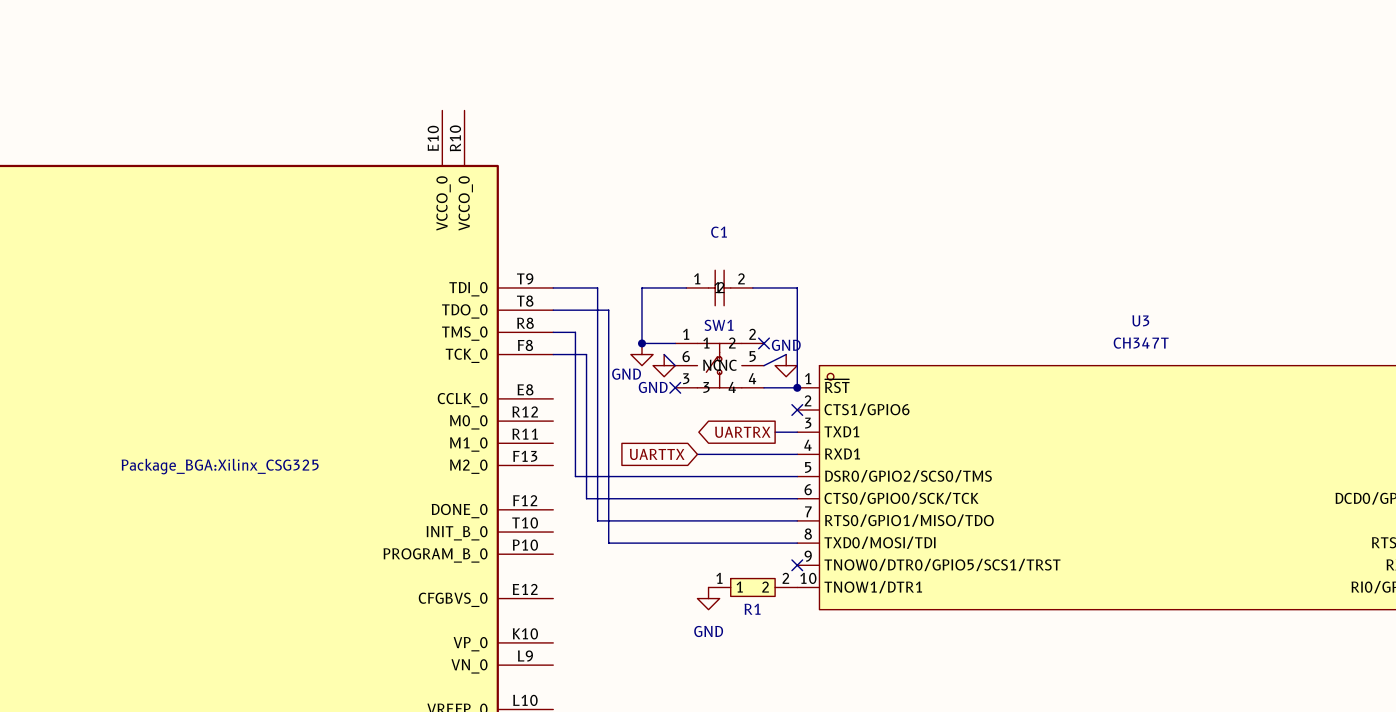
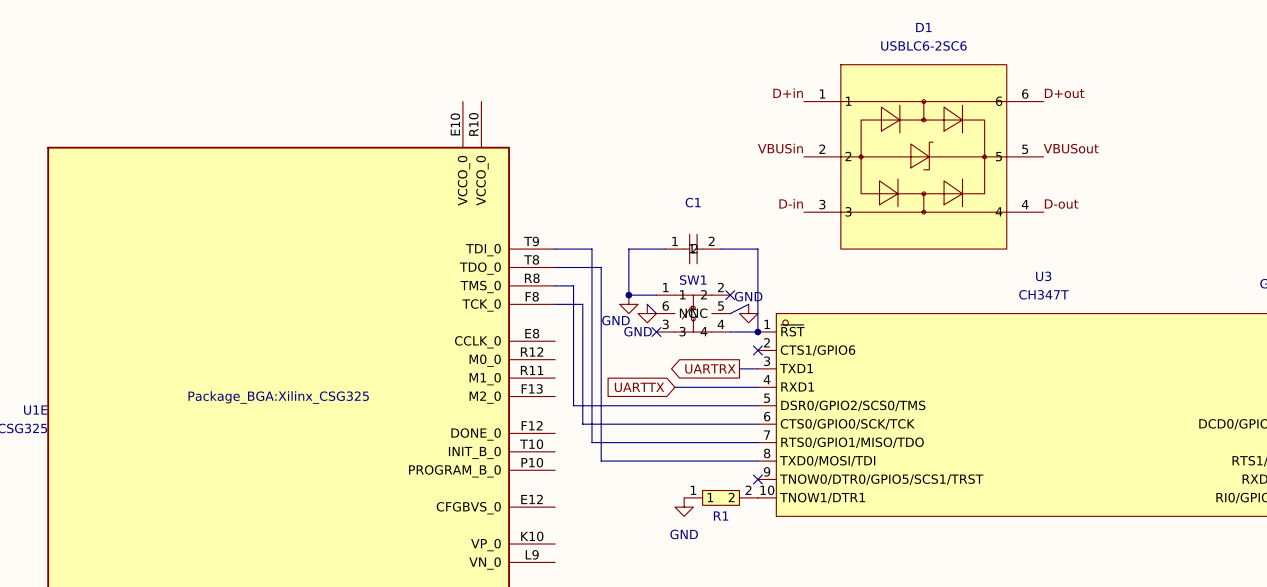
label: none -> D+in (788, 93)
label: none -> D+out (1064, 93)
label: none -> VBUSin (780, 148)
label: none -> VBUSout (1071, 148)
D1: none -> USBLC6-2SC6 (923, 156)
label: none -> D-in (791, 203)
label: none -> D-out (1061, 204)

